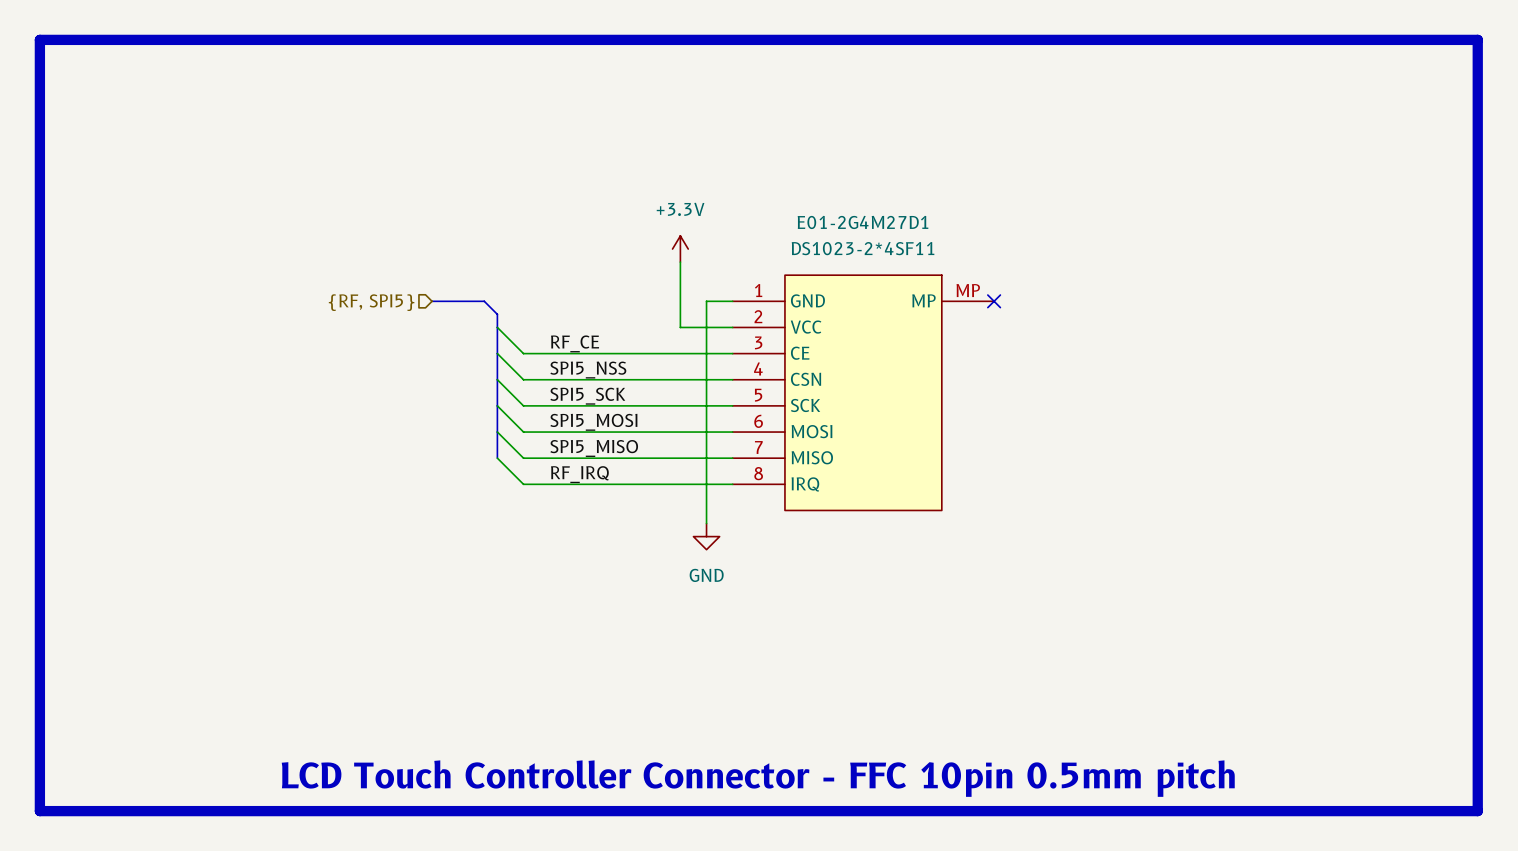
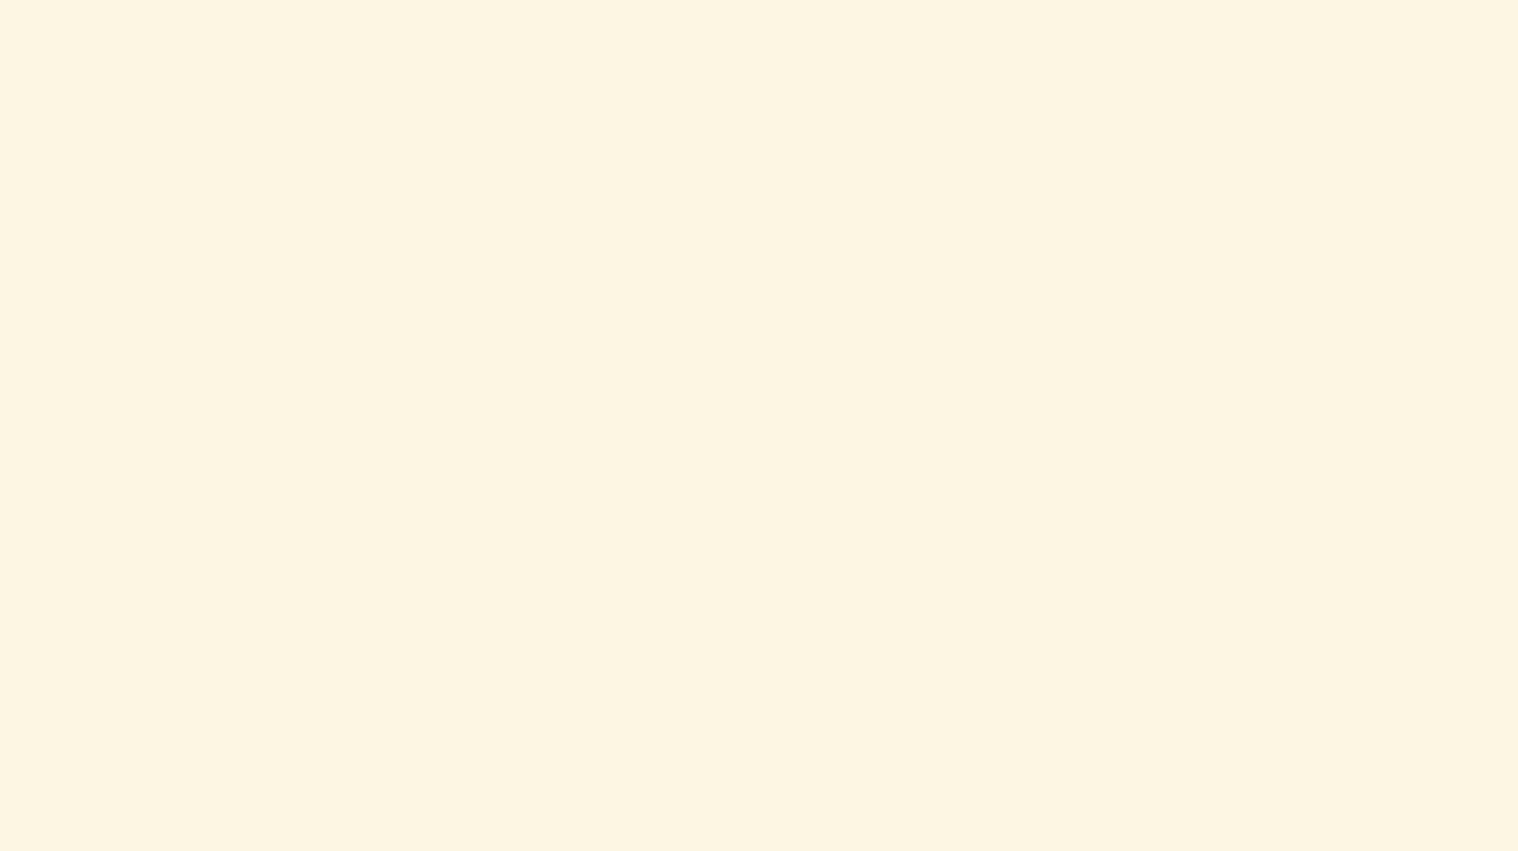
line: (39, 39) (1477, 39) (1477, 811) (39, 811) (39, 39) -> none
power symbol: +3.3V (680, 249) -> none
wire: (680, 262) (680, 327) (732, 327) -> none
bus: (432, 301) (484, 301) (497, 314) (497, 458) -> none
wire: (732, 301) (706, 301) (706, 523) -> none
no-connect mark: (994, 301) -> none
hierarchical label: {RF, SPI5} (371, 302) -> none
wire: (497, 327) (523, 353) (732, 353) -> none
label: RF_CE (575, 343) -> none
wire: (497, 353) (523, 379) (732, 379) -> none
label: SPI5_NSS (588, 370) -> none
wire: (497, 379) (523, 405) (732, 405) -> none
E01-2G4M27D1: DS1023-2*4SF11 (863, 392) -> none
label: SPI5_SCK (587, 396) -> none
wire: (497, 405) (523, 432) (732, 432) -> none
label: SPI5_MOSI (593, 422) -> none
wire: (497, 432) (523, 458) (732, 458) -> none
label: SPI5_MISO (594, 448) -> none
wire: (497, 458) (523, 484) (732, 484) -> none
label: RF_IRQ (579, 474) -> none
power symbol: GND (706, 536) -> none
text: LCD Touch Controller Connector - FFC 10pin 0.5mm pitch (758, 778) -> none

